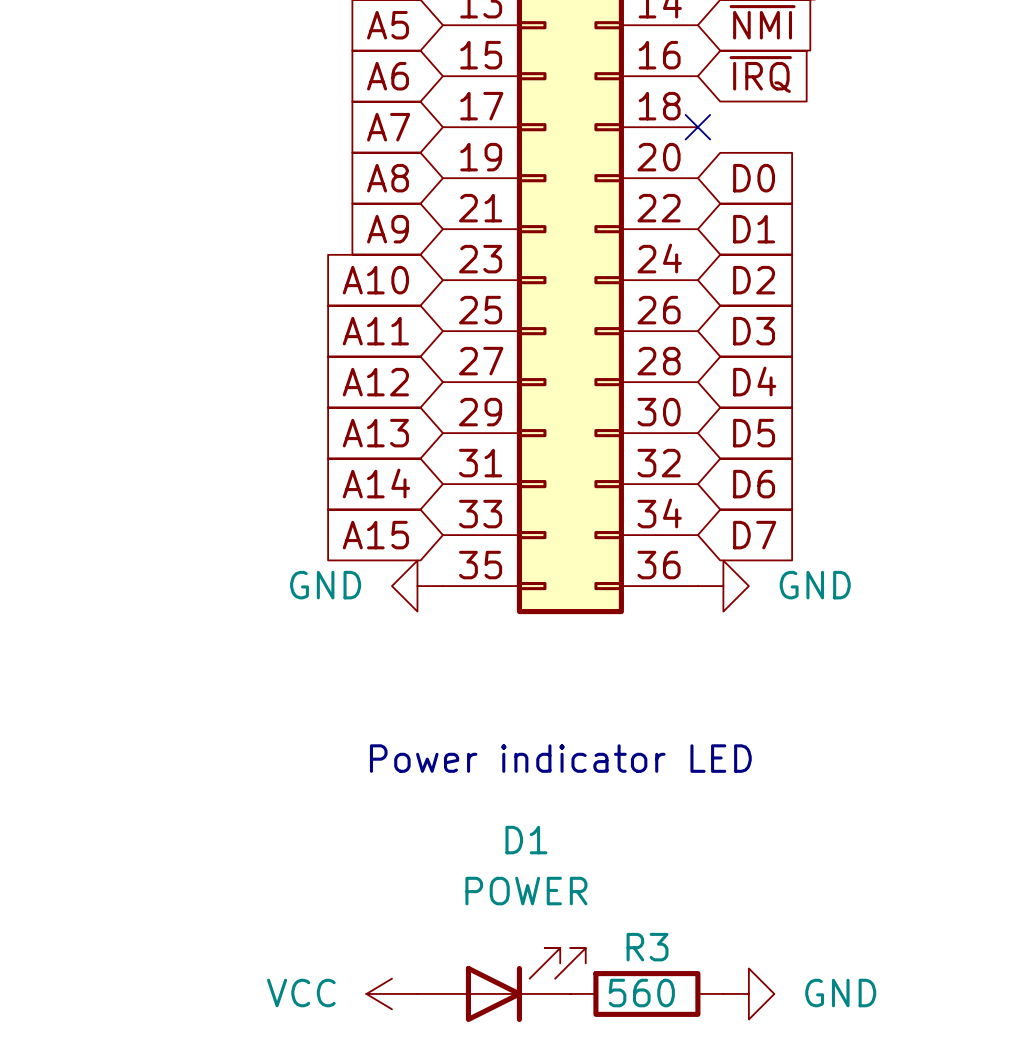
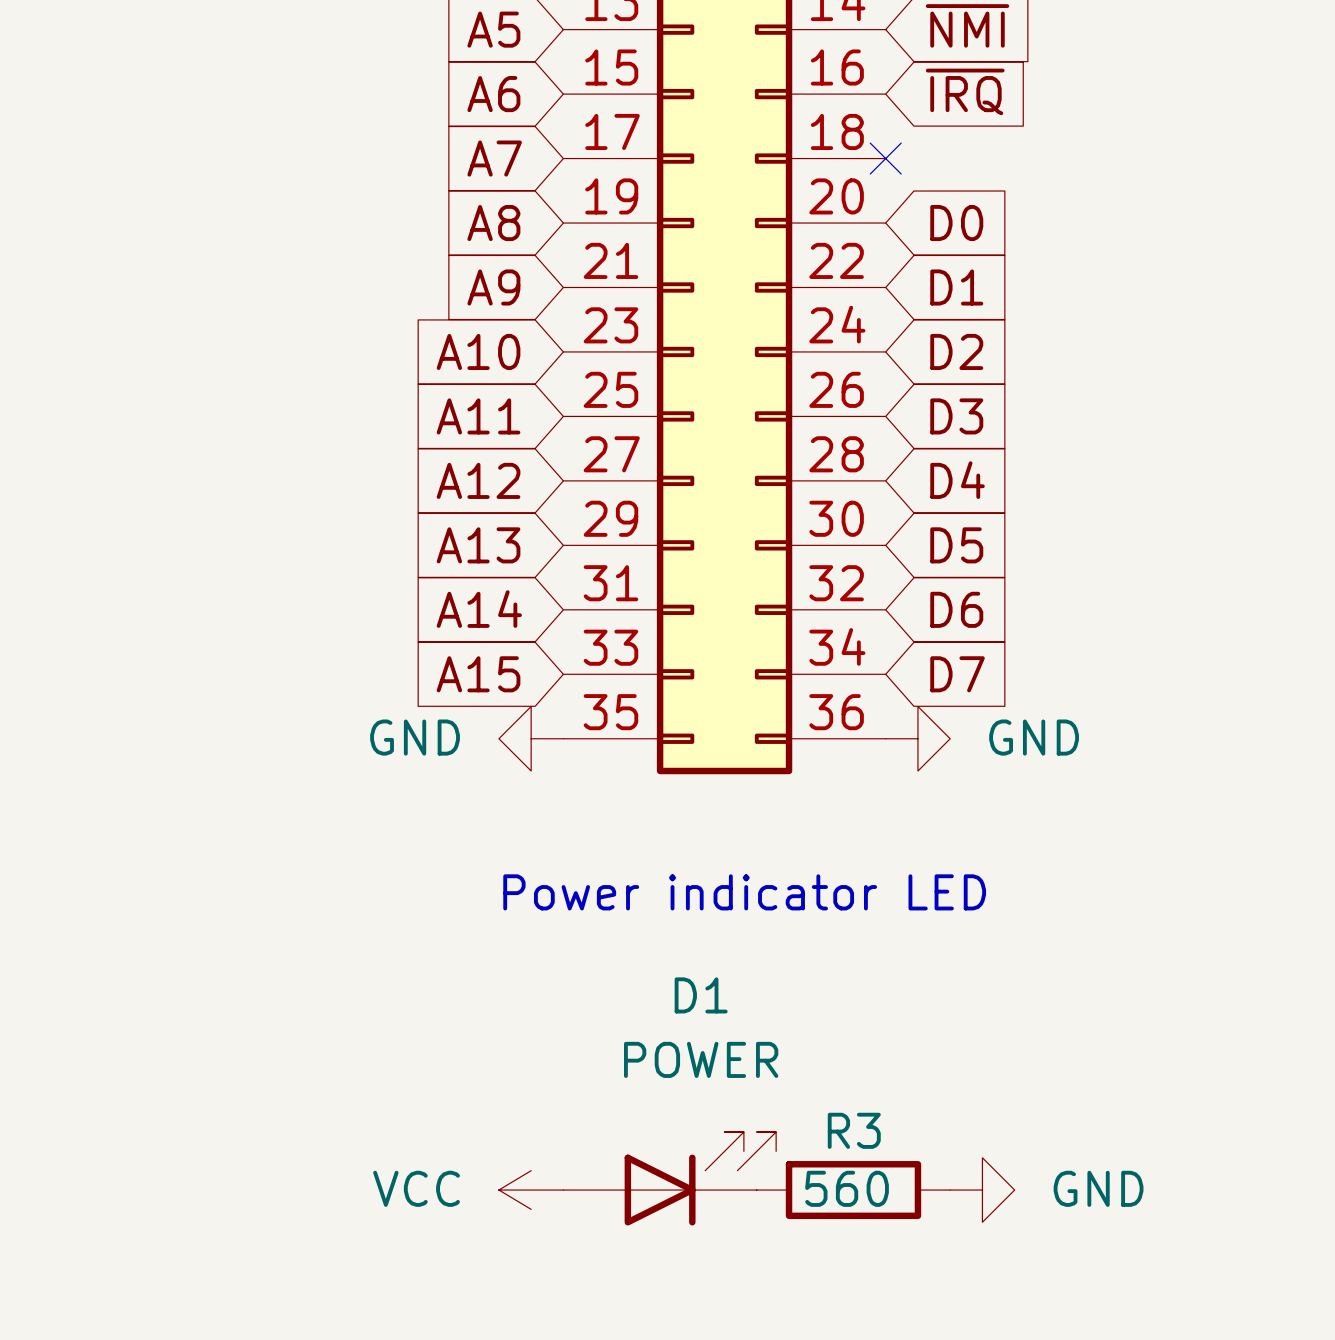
text position: Power indicator LED (560, 758) -> Power indicator LED (744, 892)
D1 position: (501, 985) -> (669, 1178)
power symbol position: VCC (391, 993) -> VCC (531, 1190)
R3 position: (646, 993) -> (853, 1190)
power symbol position: GND (748, 993) -> GND (982, 1190)

